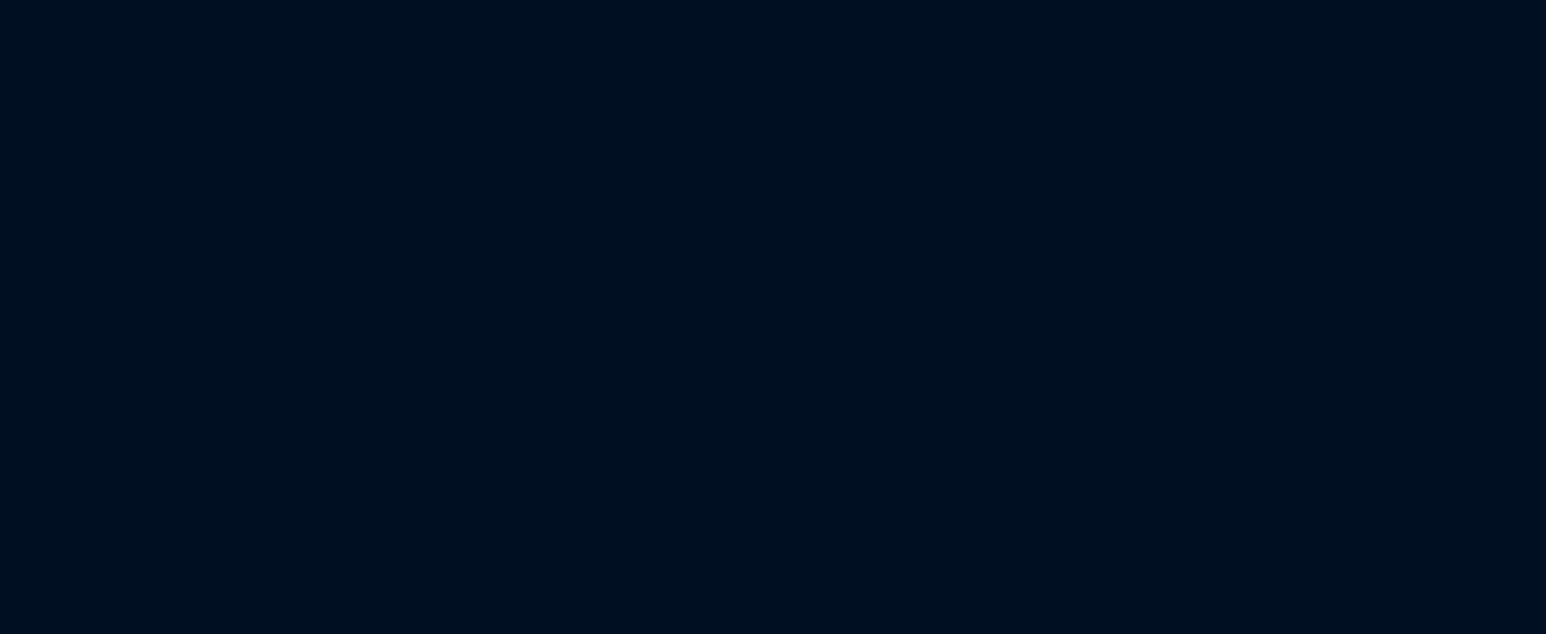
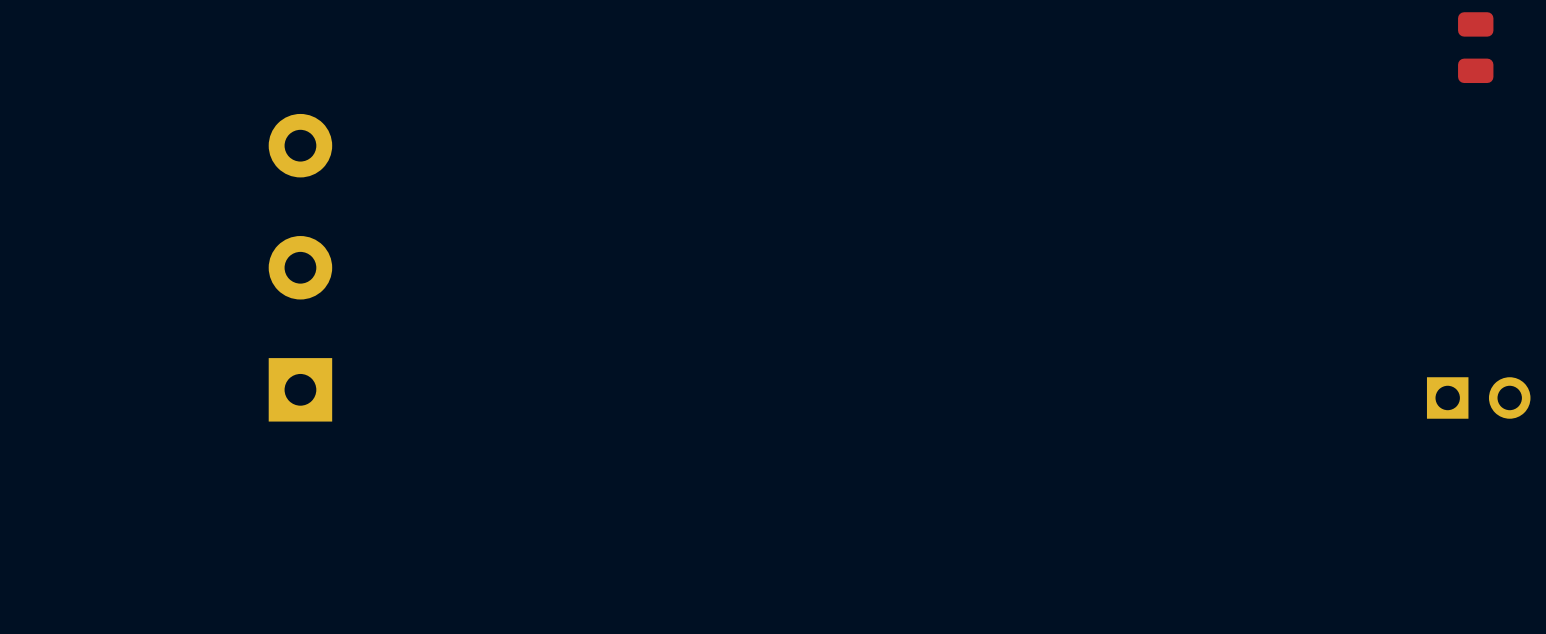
part: none -> (1475, 47)
part: none -> (300, 267)
part: none -> (1478, 397)

